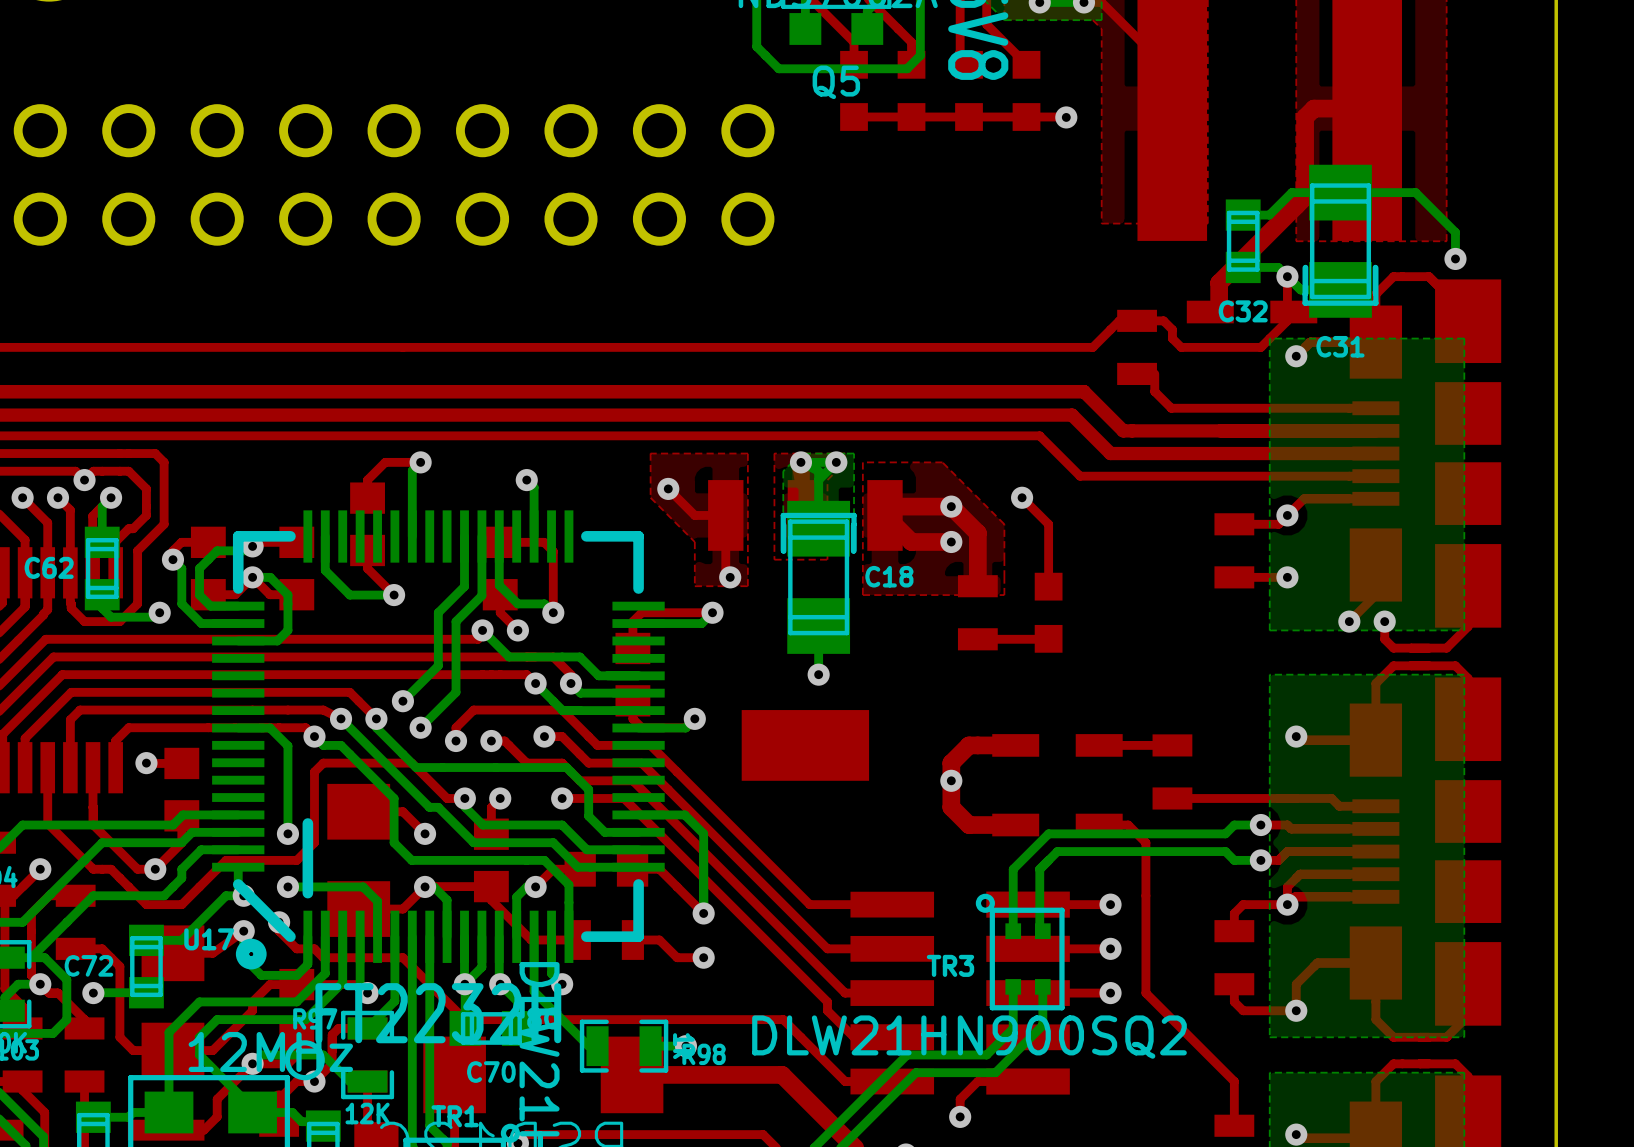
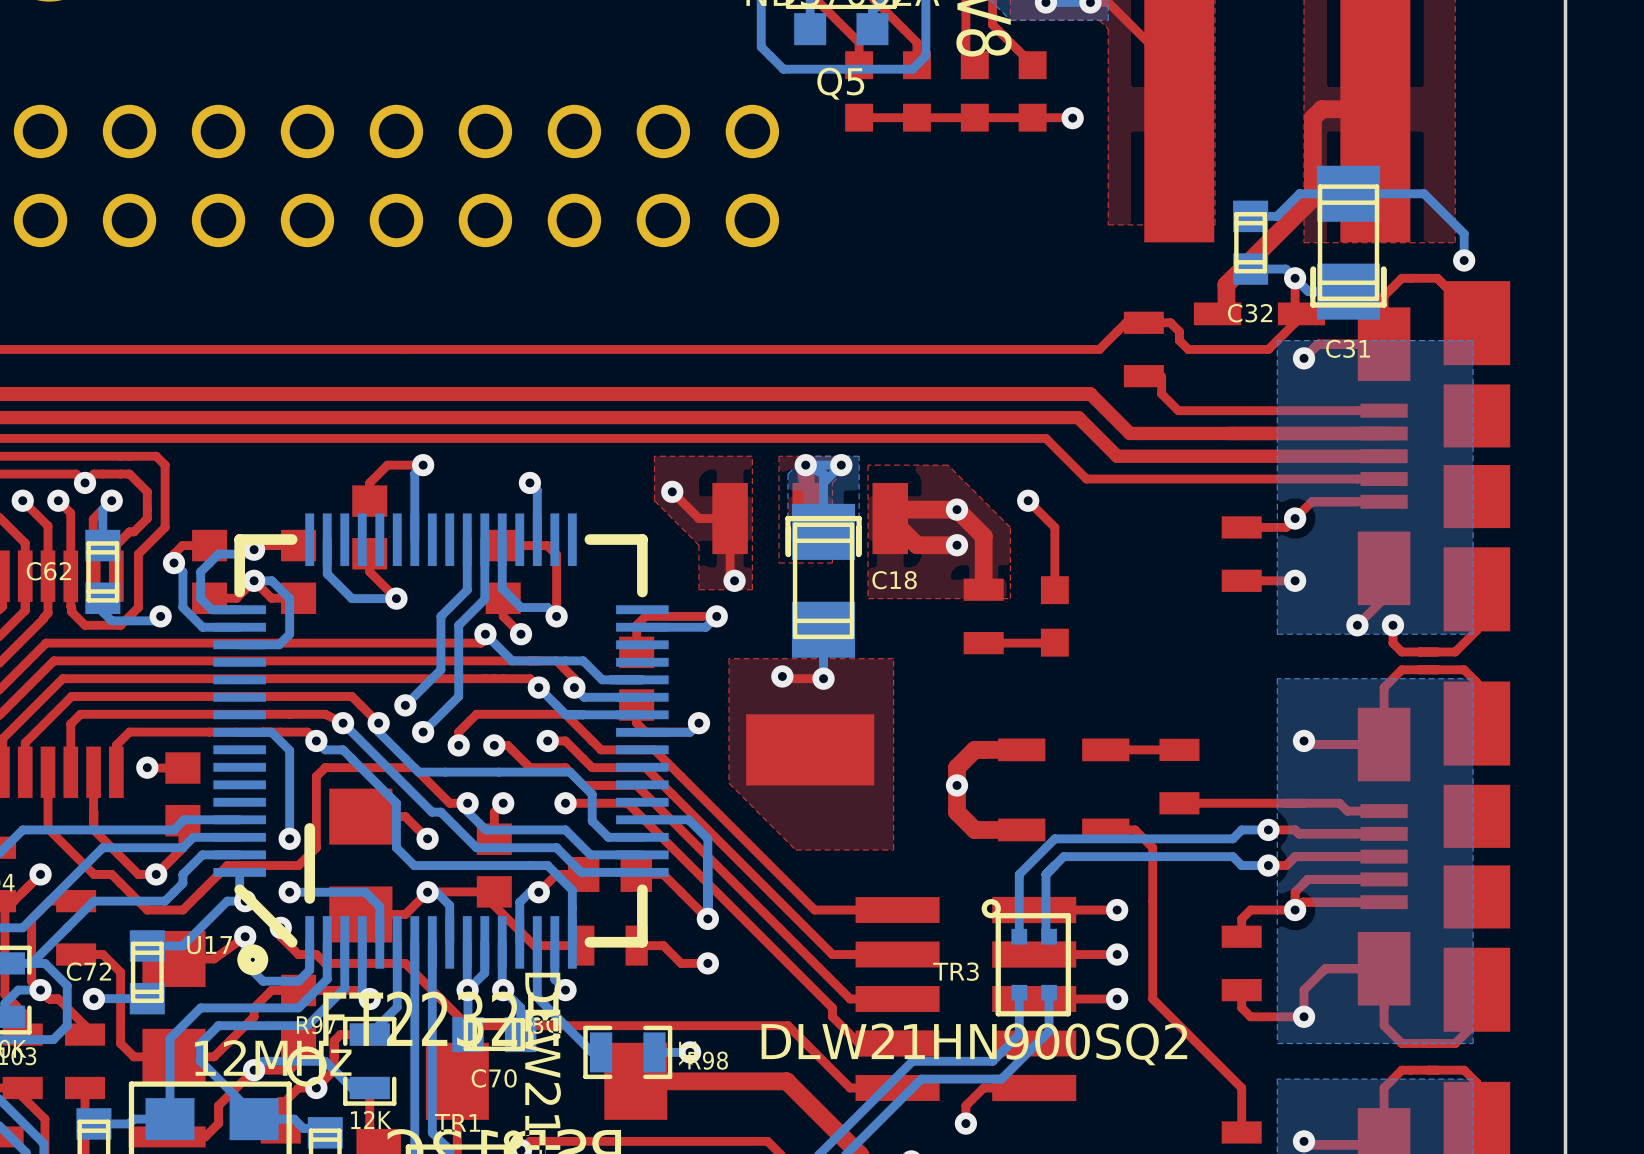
top zone outline: none -> (893, 658) (728, 658) (728, 783) (795, 849) (893, 849) (893, 658)
top track: none -> (782, 676) (784, 678) (823, 678)
via: none -> (782, 676)

